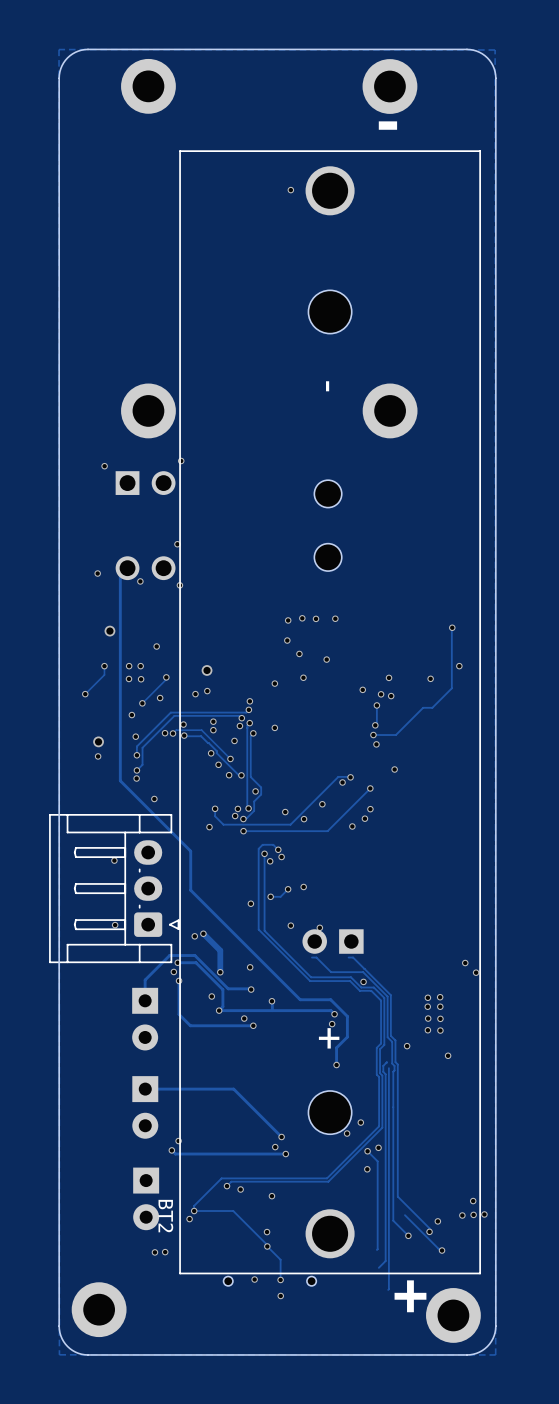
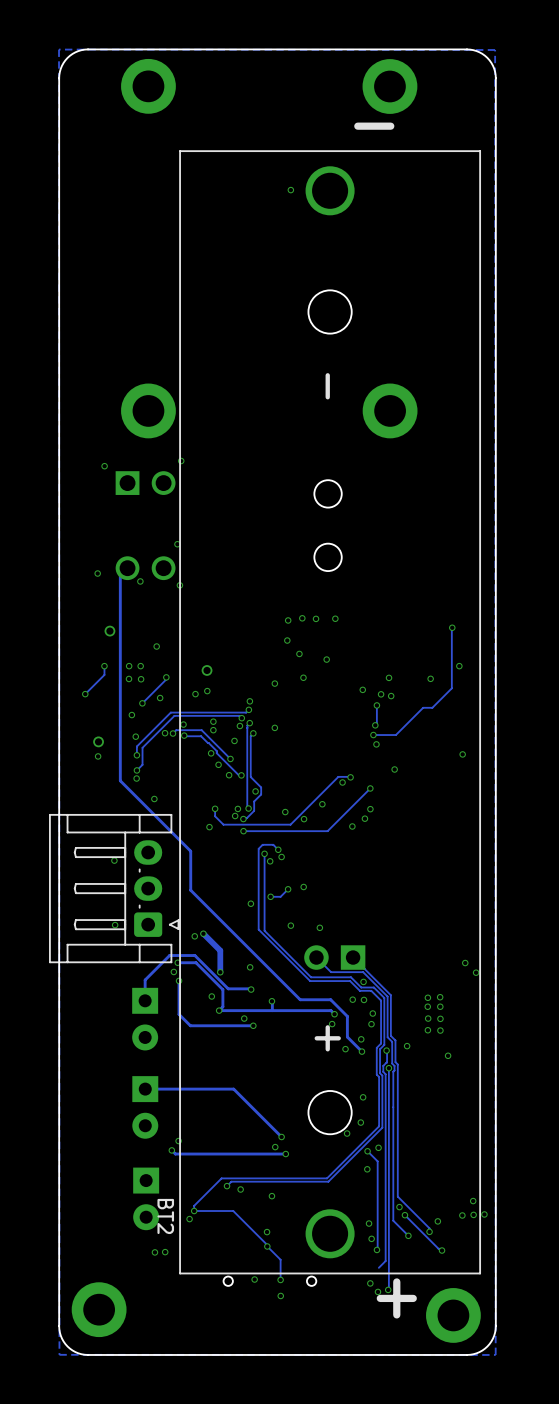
via: none -> (462, 754)
part position: (333, 941) -> (334, 957)
via: none -> (352, 999)
via: none -> (363, 999)
via: none -> (372, 1013)
via: none -> (371, 1024)
track: (347, 1037) (336, 1047) (336, 1065) -> (347, 1037) (361, 1051)
via: none -> (361, 1039)
via: none -> (345, 1049)
track: none -> (386, 1050) (387, 1062)
via: none -> (386, 1050)
via: none -> (361, 1051)
via: (336, 1065) -> none
via: none -> (388, 1068)
via: none -> (363, 1097)
via: none -> (399, 1207)
via: none -> (404, 1215)
via: none -> (369, 1223)
via: none -> (371, 1238)
via: none -> (376, 1249)
via: none -> (370, 1283)
via: none -> (388, 1289)
via: none -> (377, 1291)

